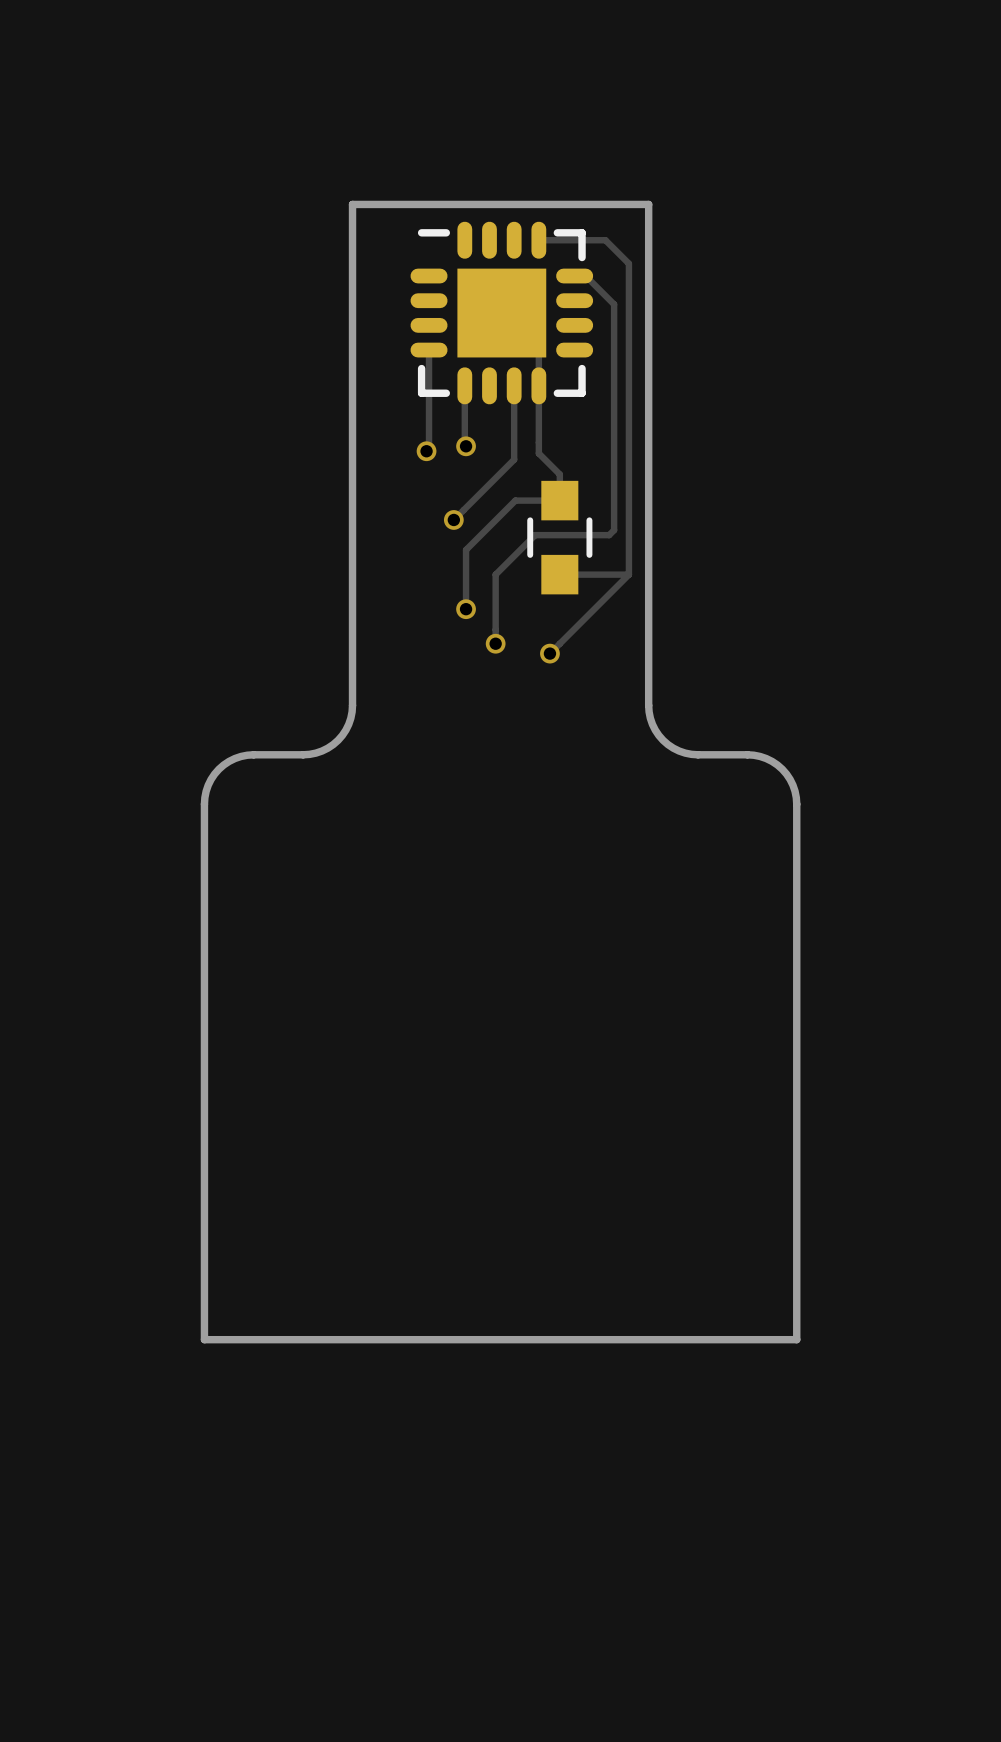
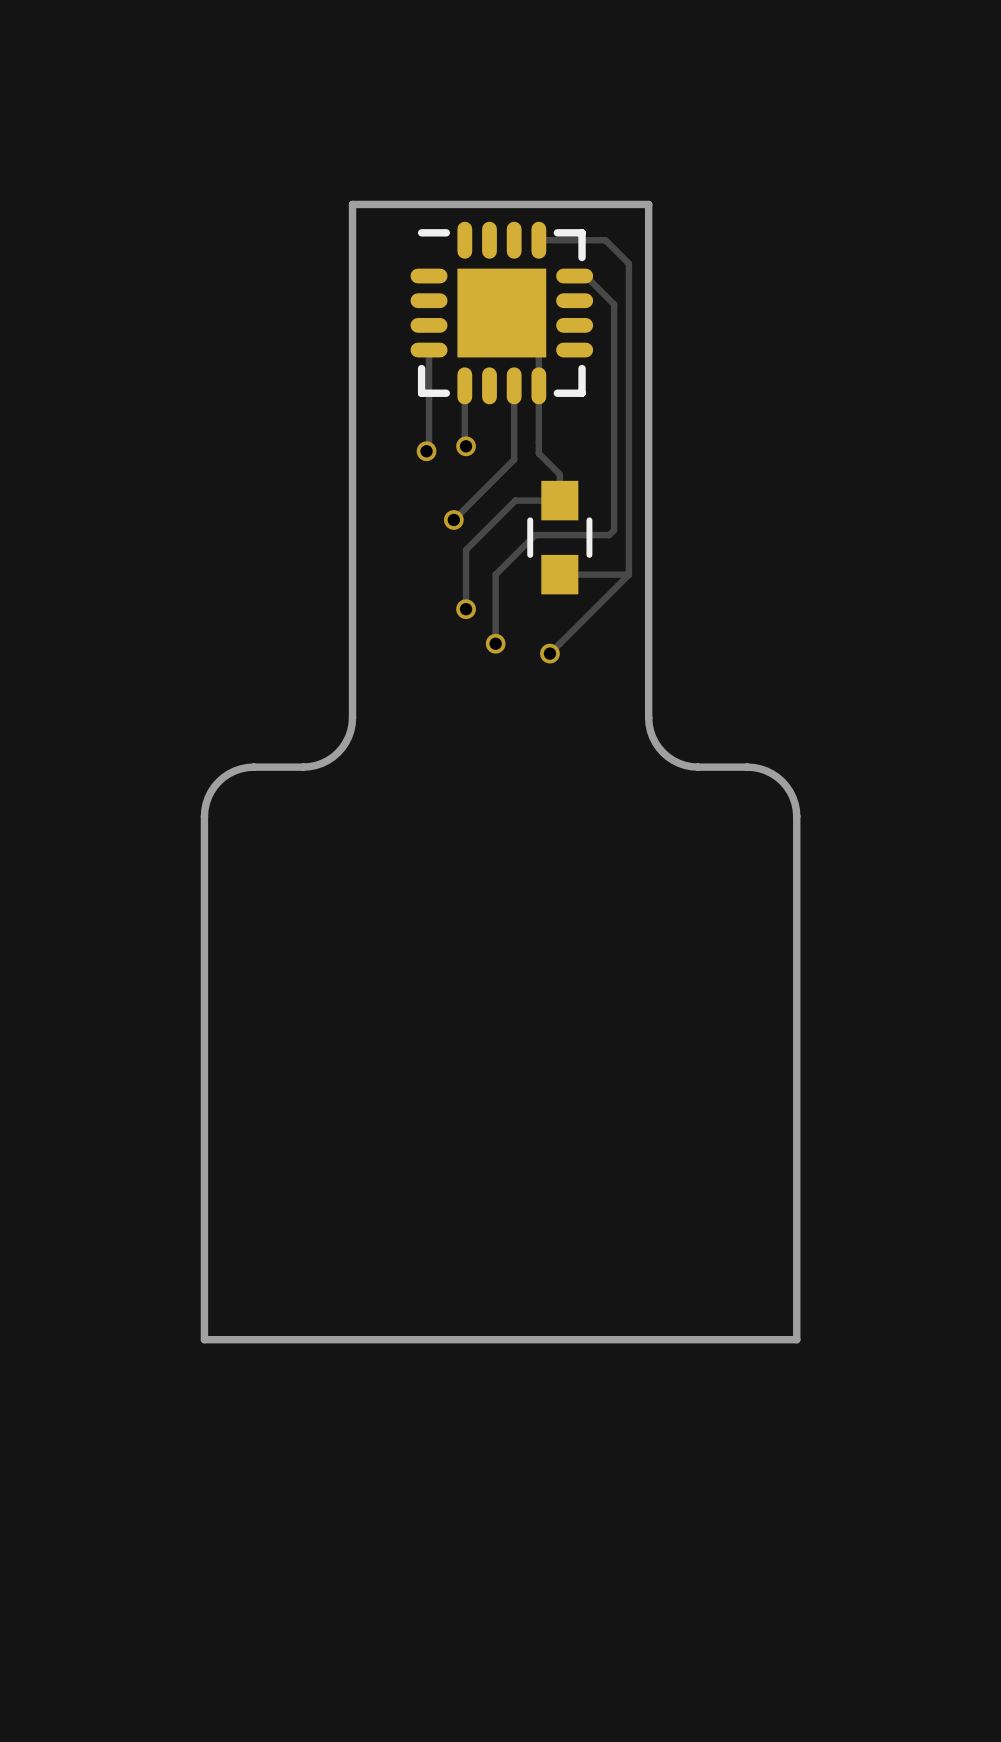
board edge: (352, 705) (348, 724) (342, 735) (333, 744) (322, 751) (303, 754) (247, 755) (234, 758) (223, 764) (214, 774) (208, 785) (204, 797) (204, 816) -> (352, 705) (352, 724) (348, 736) (342, 747) (333, 756) (322, 763) (309, 766) (253, 767) (234, 770) (223, 777) (214, 786) (208, 797) (204, 816)
board edge: (648, 705) (652, 724) (658, 735) (667, 744) (679, 751) (698, 754) (753, 755) (766, 758) (777, 764) (786, 774) (792, 785) (796, 797) (796, 816) -> (648, 705) (649, 724) (652, 736) (658, 747) (667, 756) (679, 763) (691, 766) (747, 767) (766, 770) (777, 777) (786, 786) (792, 797) (796, 816)

